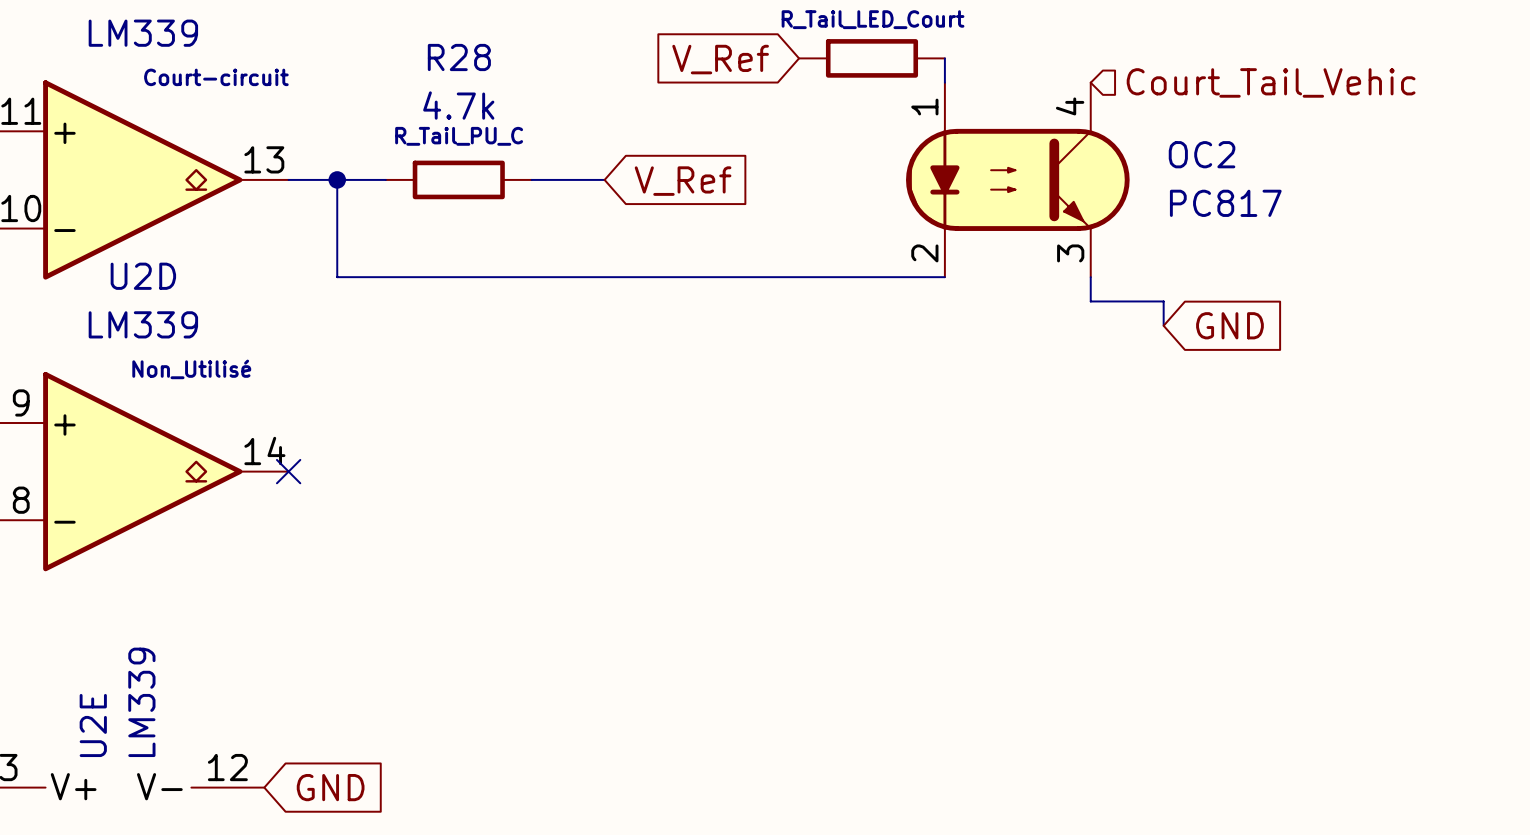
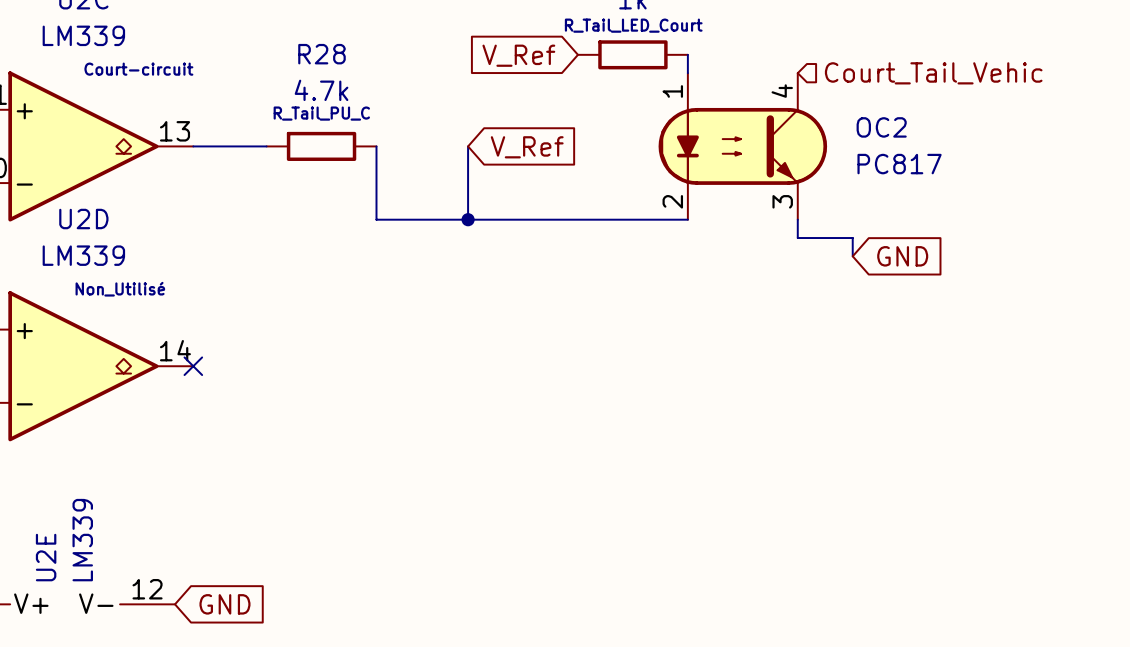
wire: (337, 179) (337, 277) (531, 277) -> none
junction: (337, 179) -> none
wire: (531, 179) (604, 179) -> (376, 146) (376, 219)
wire: none -> (468, 146) (468, 219)
global label position: V_Ref (683, 181) -> V_Ref (527, 147)
junction: none -> (468, 219)

